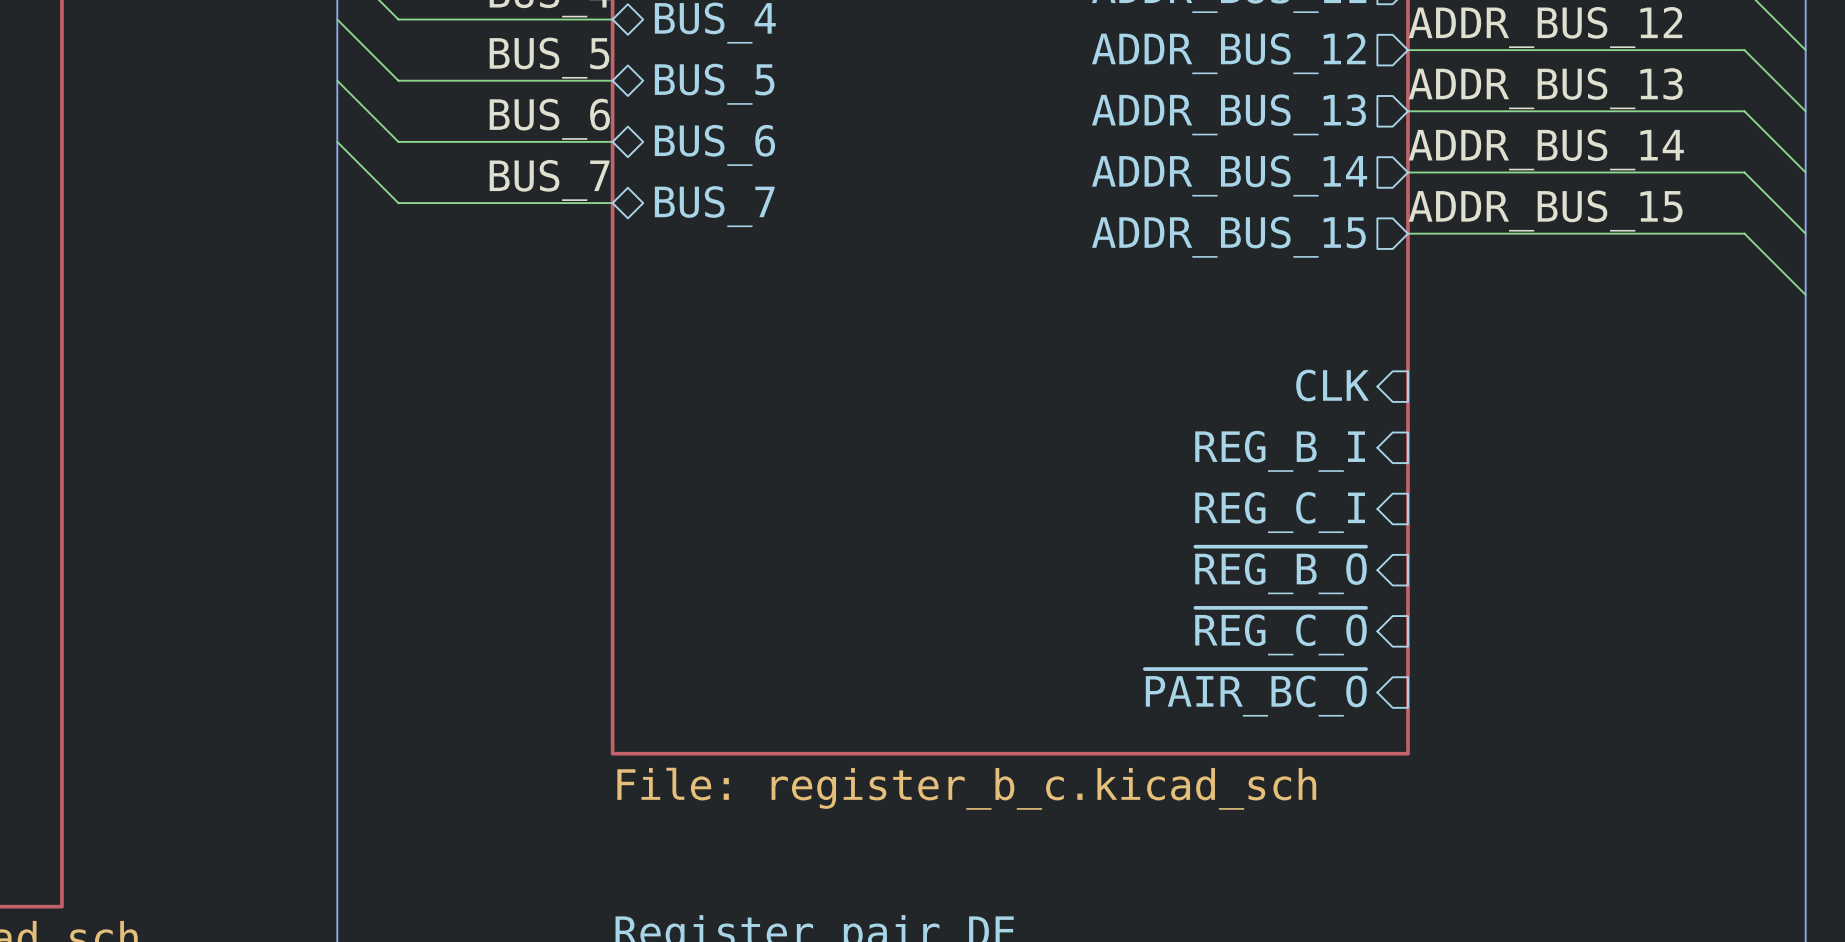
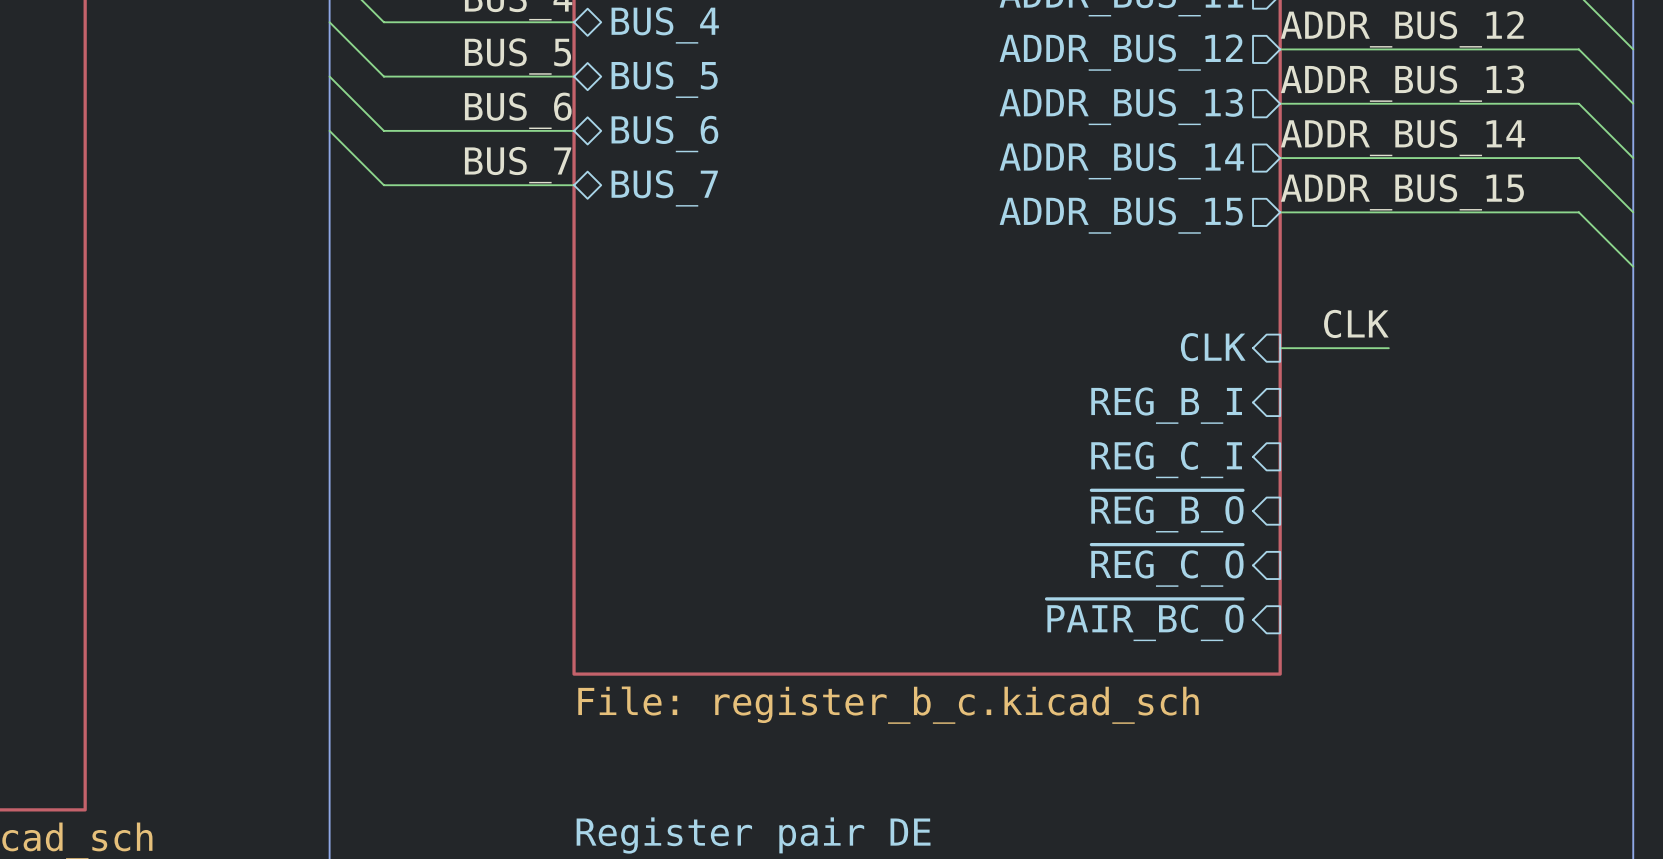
label: none -> CLK (1356, 323)
wire: none -> (1280, 348) (1388, 348)

